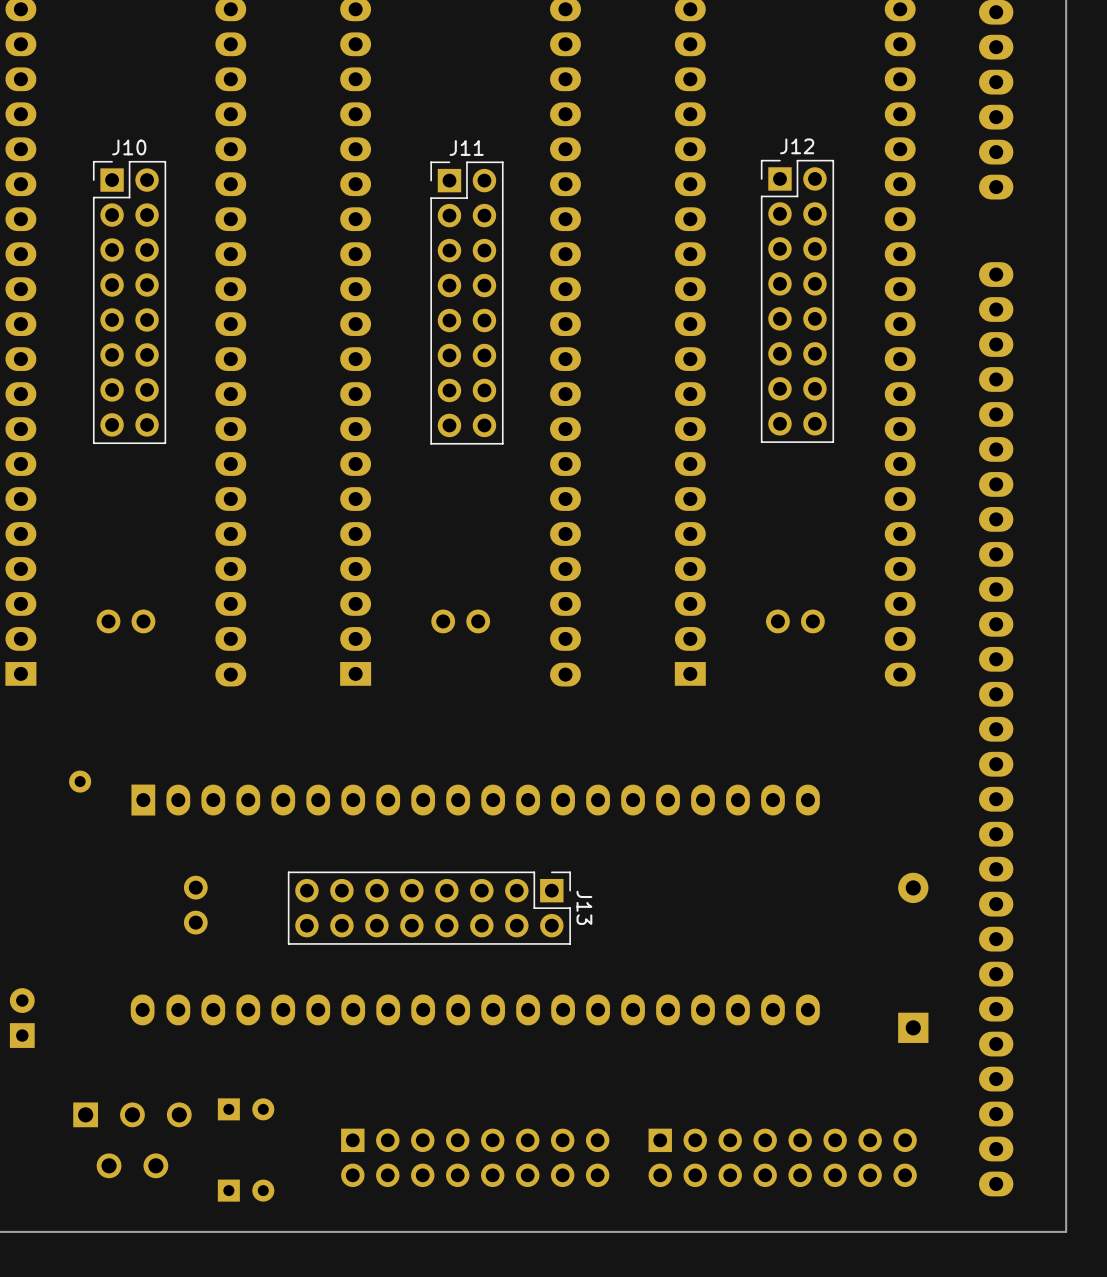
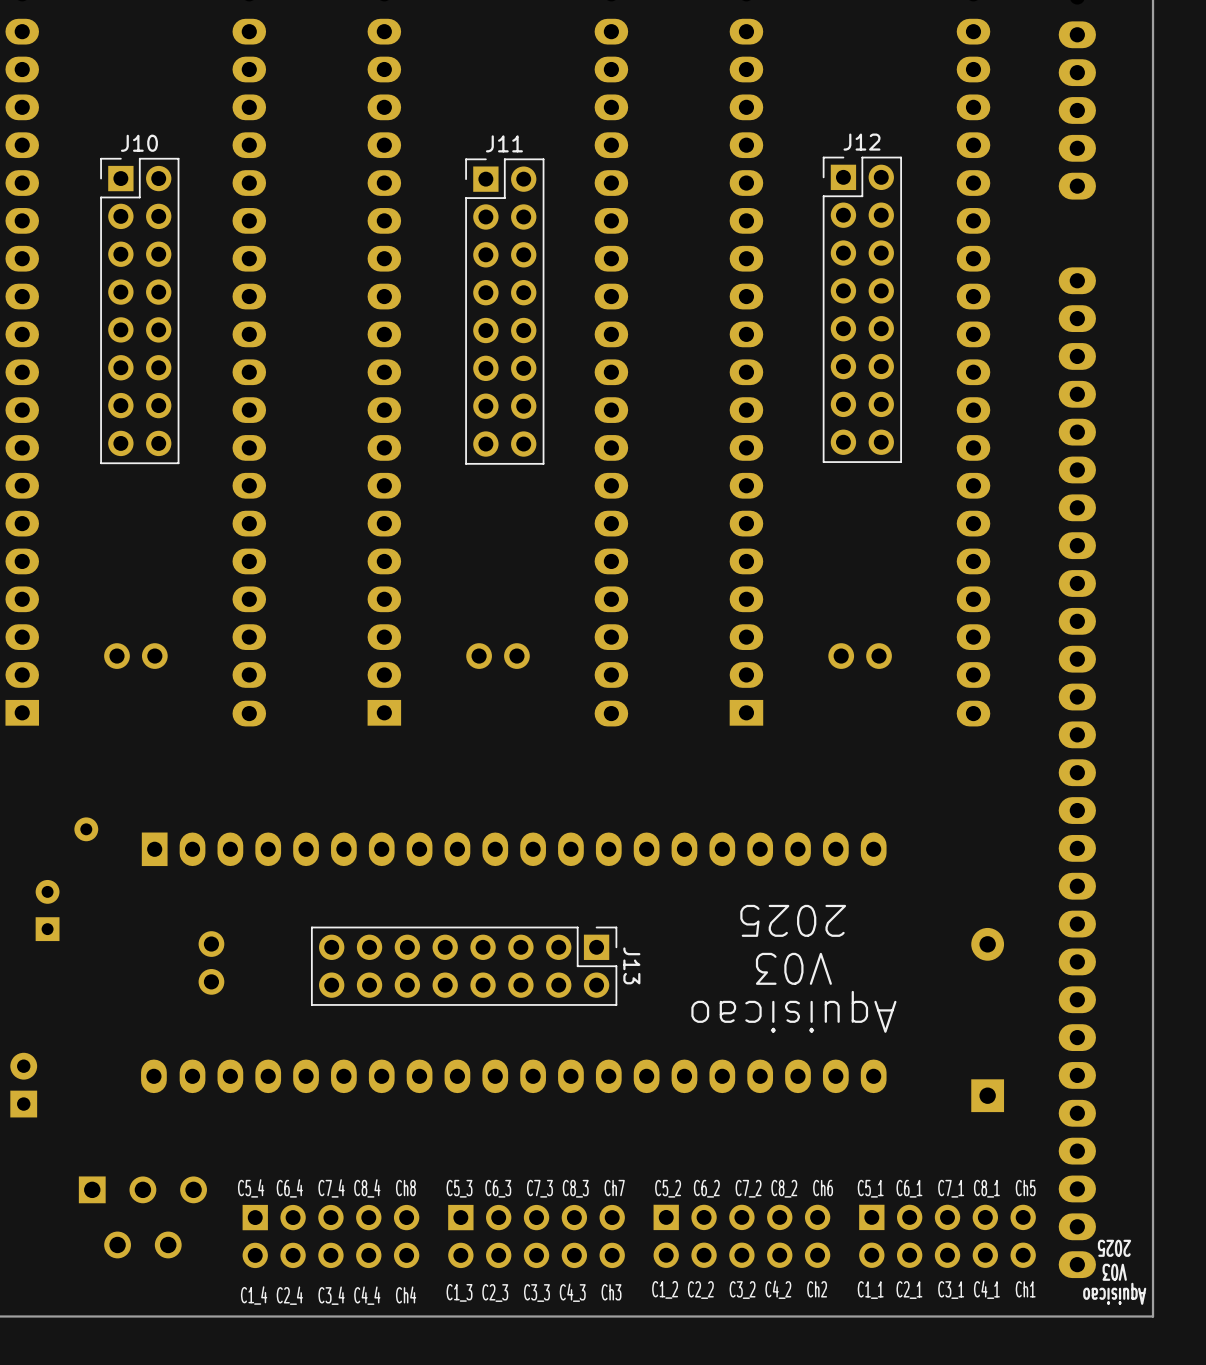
part: none -> (47, 910)
text: none -> 2025 (793, 920)
text: none -> V03 (793, 968)
text: none -> Aquisicao (793, 1011)
part: (246, 1109) -> none
text: none -> C5_4 (251, 1188)
text: none -> C6_4 (289, 1188)
text: none -> C7_4 (331, 1188)
text: none -> C8_4 (367, 1188)
text: none -> Ch8 (405, 1188)
text: none -> C5_3 (459, 1188)
text: none -> C6_3 (498, 1188)
text: none -> C7_3 (539, 1188)
text: none -> C8_3 (575, 1188)
text: none -> Ch7 (614, 1188)
text: none -> C5_2 (668, 1188)
text: none -> C6_2 (706, 1188)
text: none -> C7_2 (748, 1188)
text: none -> C8_2 (784, 1188)
text: none -> Ch6 (823, 1188)
text: none -> C5_1 (870, 1188)
text: none -> C6_1 (909, 1188)
text: none -> C7_1 (951, 1188)
text: none -> C8_1 (986, 1188)
text: none -> Ch5 (1025, 1188)
part: none -> (330, 1236)
part: (475, 1157) -> none
part: none -> (536, 1236)
part: none -> (741, 1236)
part: (782, 1157) -> none
part: none -> (947, 1236)
text: none -> 2025 (1114, 1248)
part: (246, 1190) -> none
text: none -> V03 (1114, 1272)
text: none -> Ch2 (817, 1289)
text: none -> Ch1 (1025, 1289)
text: none -> C1_2 (665, 1289)
text: none -> C2_2 (700, 1290)
text: none -> C3_2 (742, 1290)
text: none -> C4_2 (778, 1289)
text: none -> C1_1 (870, 1290)
text: none -> C2_1 (909, 1290)
text: none -> C3_1 (951, 1290)
text: none -> C4_1 (986, 1289)
text: none -> C4_3 (572, 1292)
text: none -> Ch3 (611, 1292)
text: none -> C1_3 (459, 1292)
text: none -> C2_3 (495, 1293)
text: none -> C3_3 (536, 1293)
text: none -> Aquisicao (1114, 1293)
text: none -> C1_4 (254, 1295)
text: none -> C2_4 (289, 1295)
text: none -> C3_4 (331, 1295)
text: none -> C4_4 (367, 1295)
text: none -> Ch4 (406, 1294)

